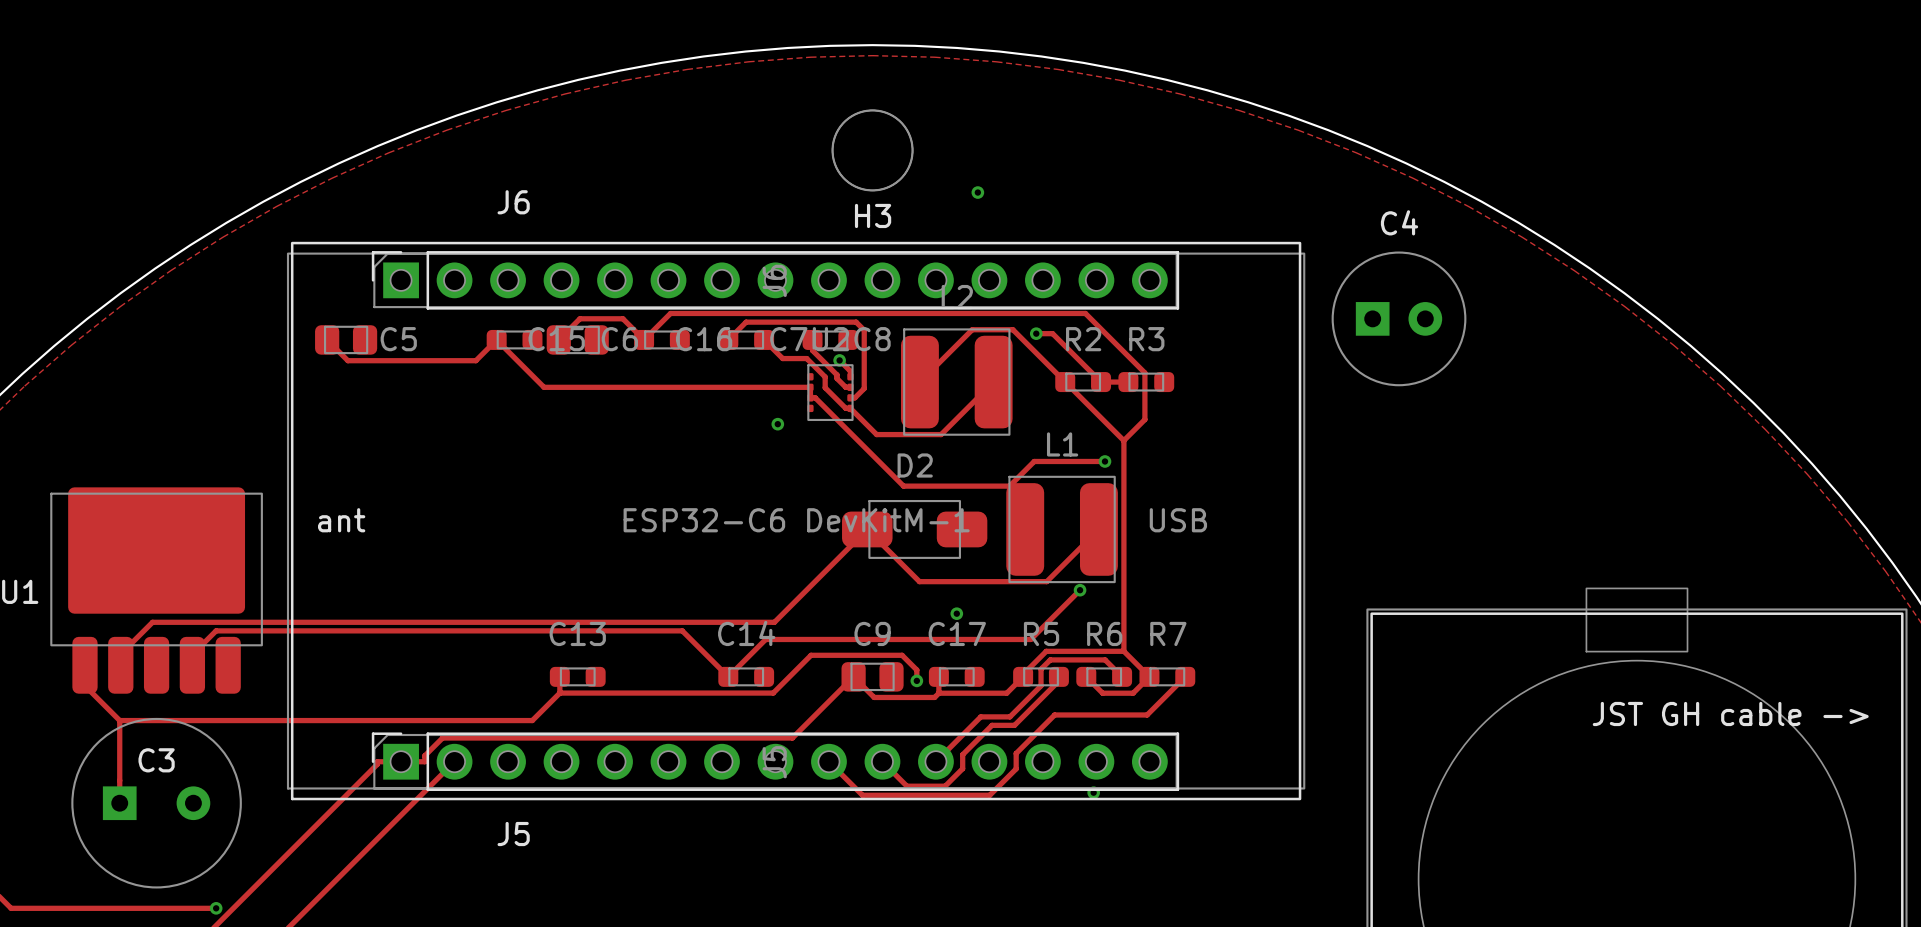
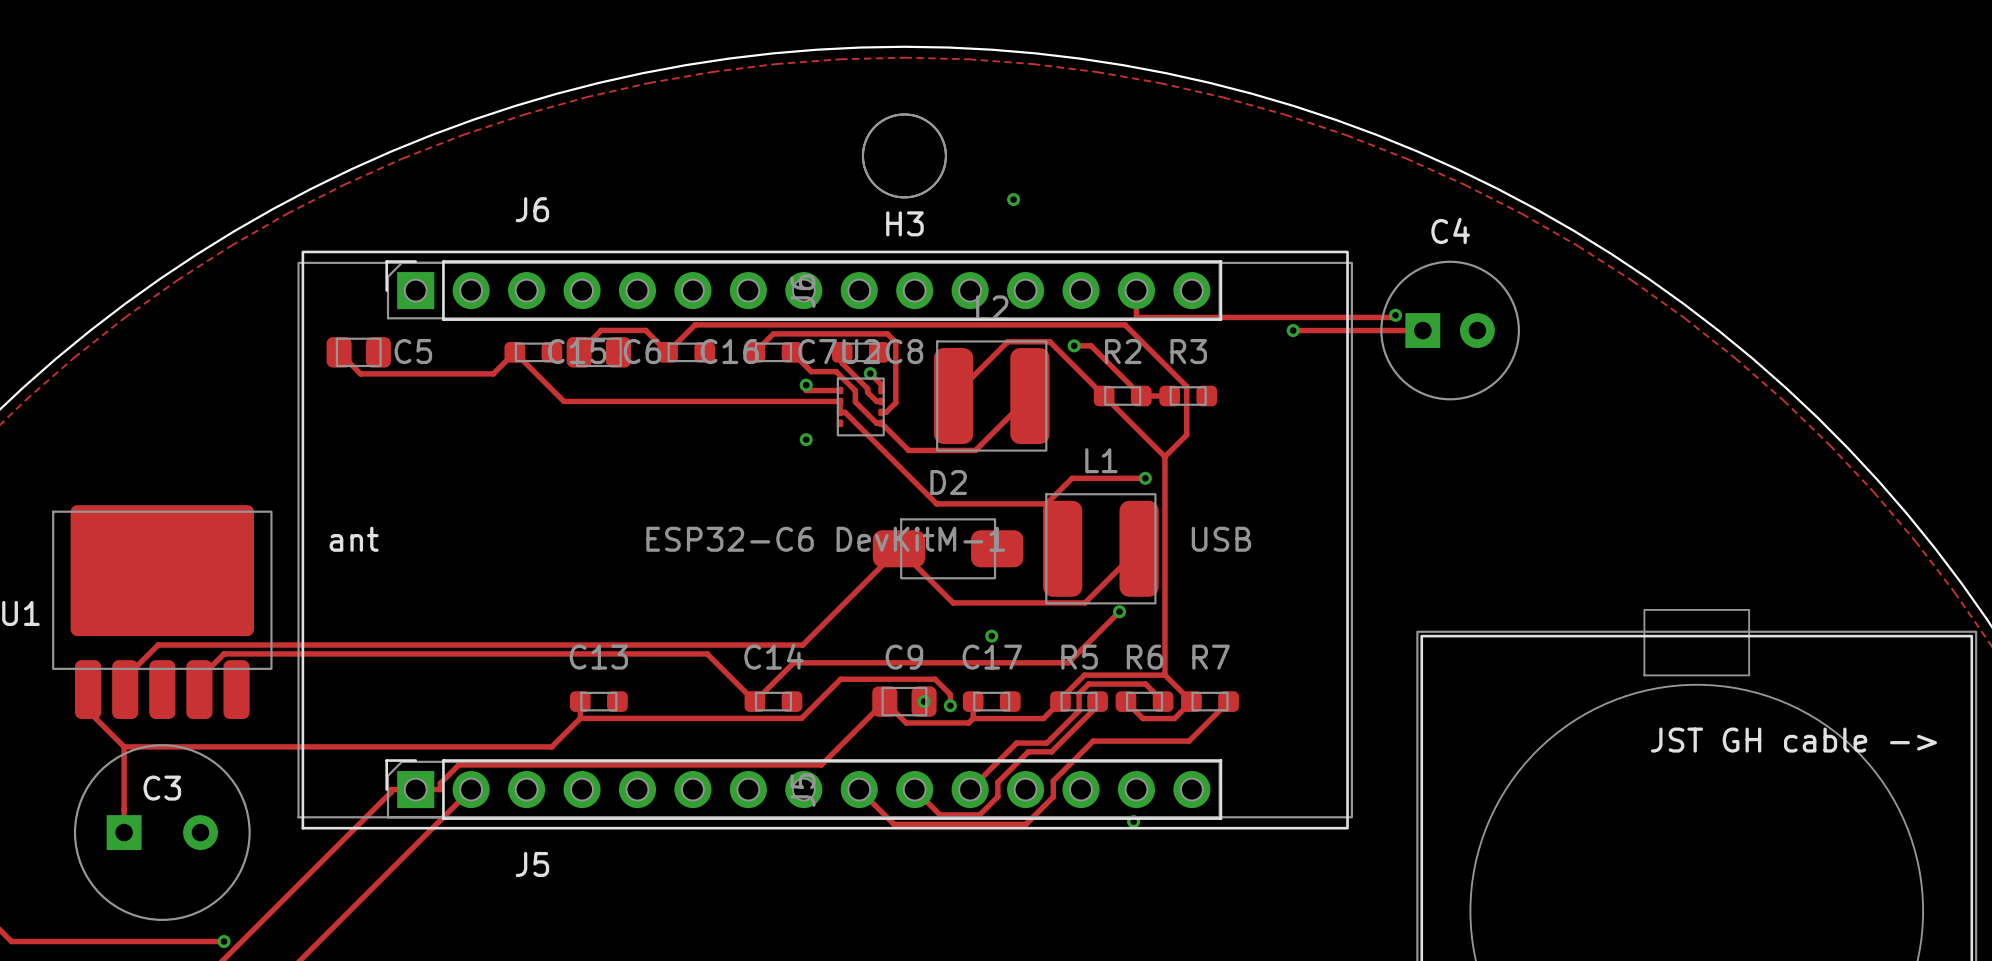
track: none -> (1136, 290) (1136, 317) (1395, 317) (1395, 315)
via: none -> (1395, 315)
track: none -> (1293, 330) (1422, 330)
via: none -> (1293, 330)
track: none -> (806, 385) (806, 390) (840, 390)
via: none -> (806, 385)
via: none -> (924, 701)

